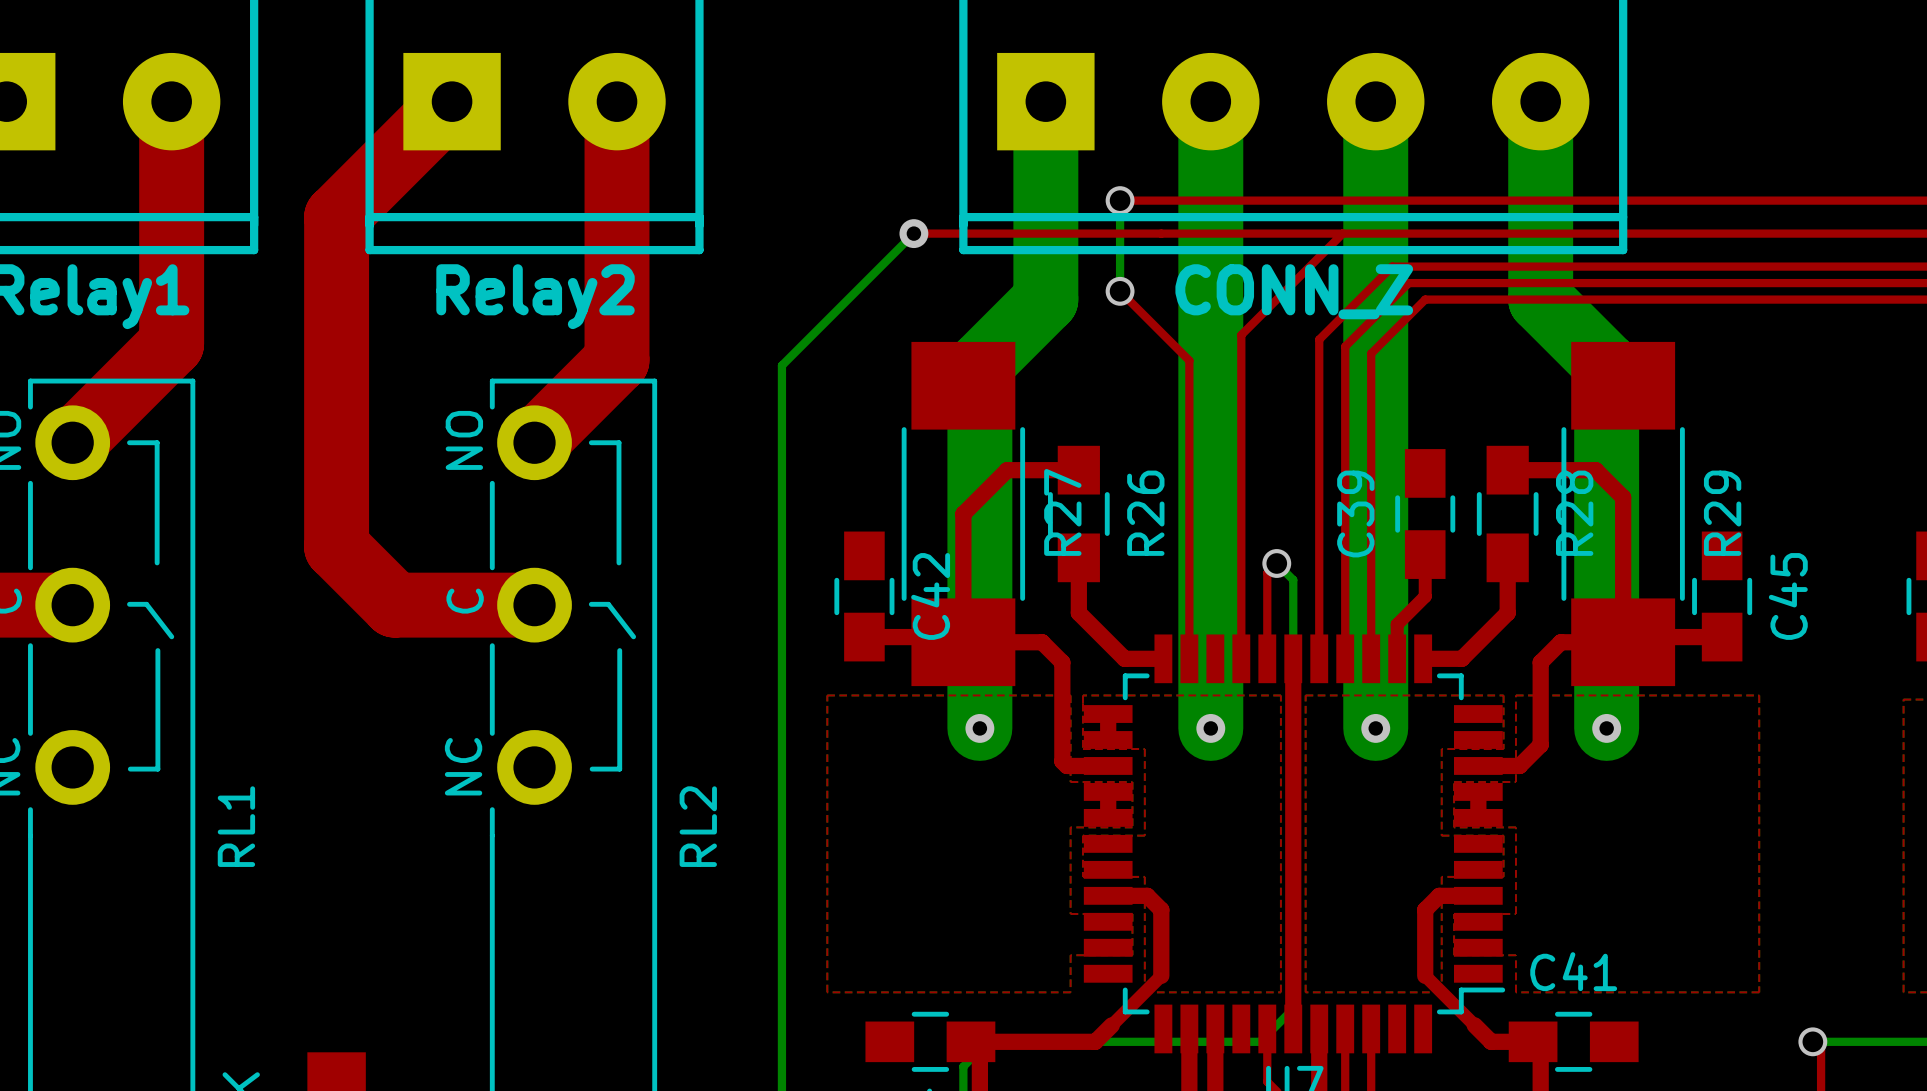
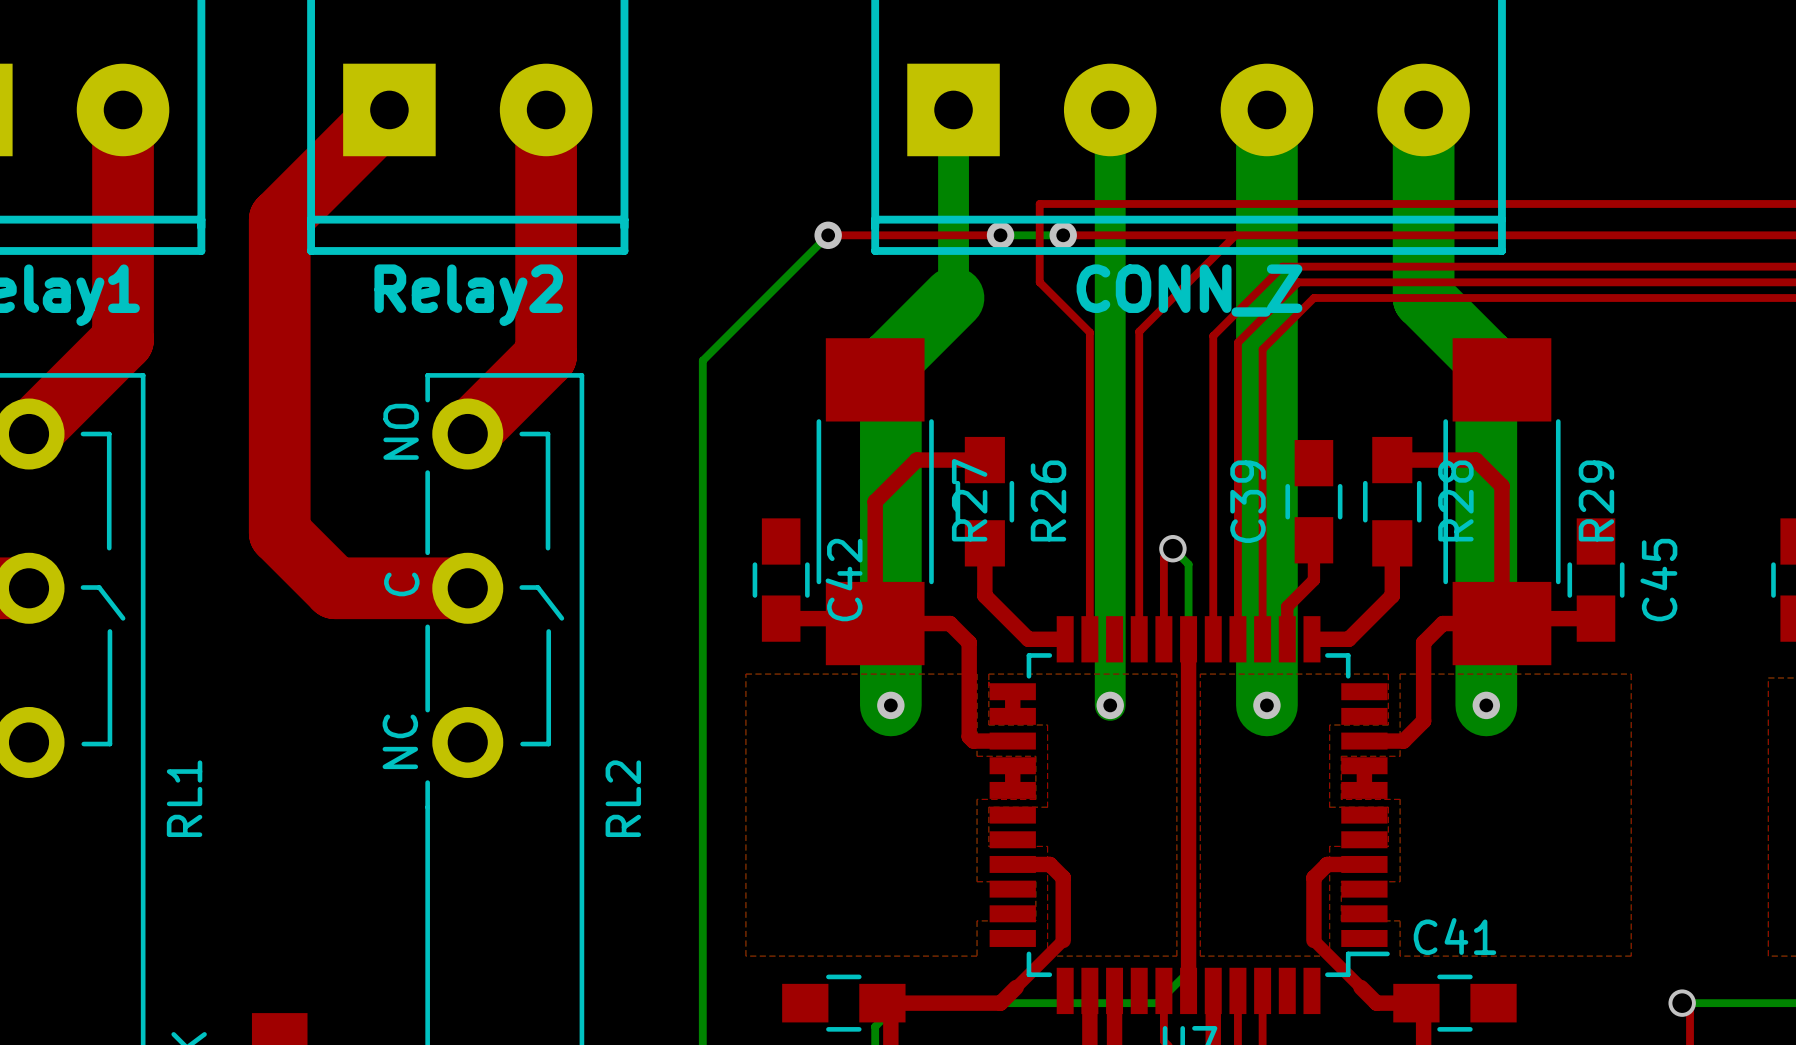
bottom track width: thick (1045, 101) (1045, 299) -> thin (953, 109) (953, 297)
bottom track width: thick (1210, 101) (1210, 728) -> thin (1110, 109) (1110, 705)
bottom track: (1120, 200) (1120, 291) -> none
via: (1120, 200) -> none
top track: (1095, 233) (1161, 233) -> none
bottom track: none -> (1000, 235) (1063, 235)
via: none -> (1000, 235)
via: none -> (1063, 235)
top track: (1120, 291) (1189, 360) -> (1039, 203) (1039, 282) (1089, 332) (1089, 355)
via: (1120, 291) -> none

